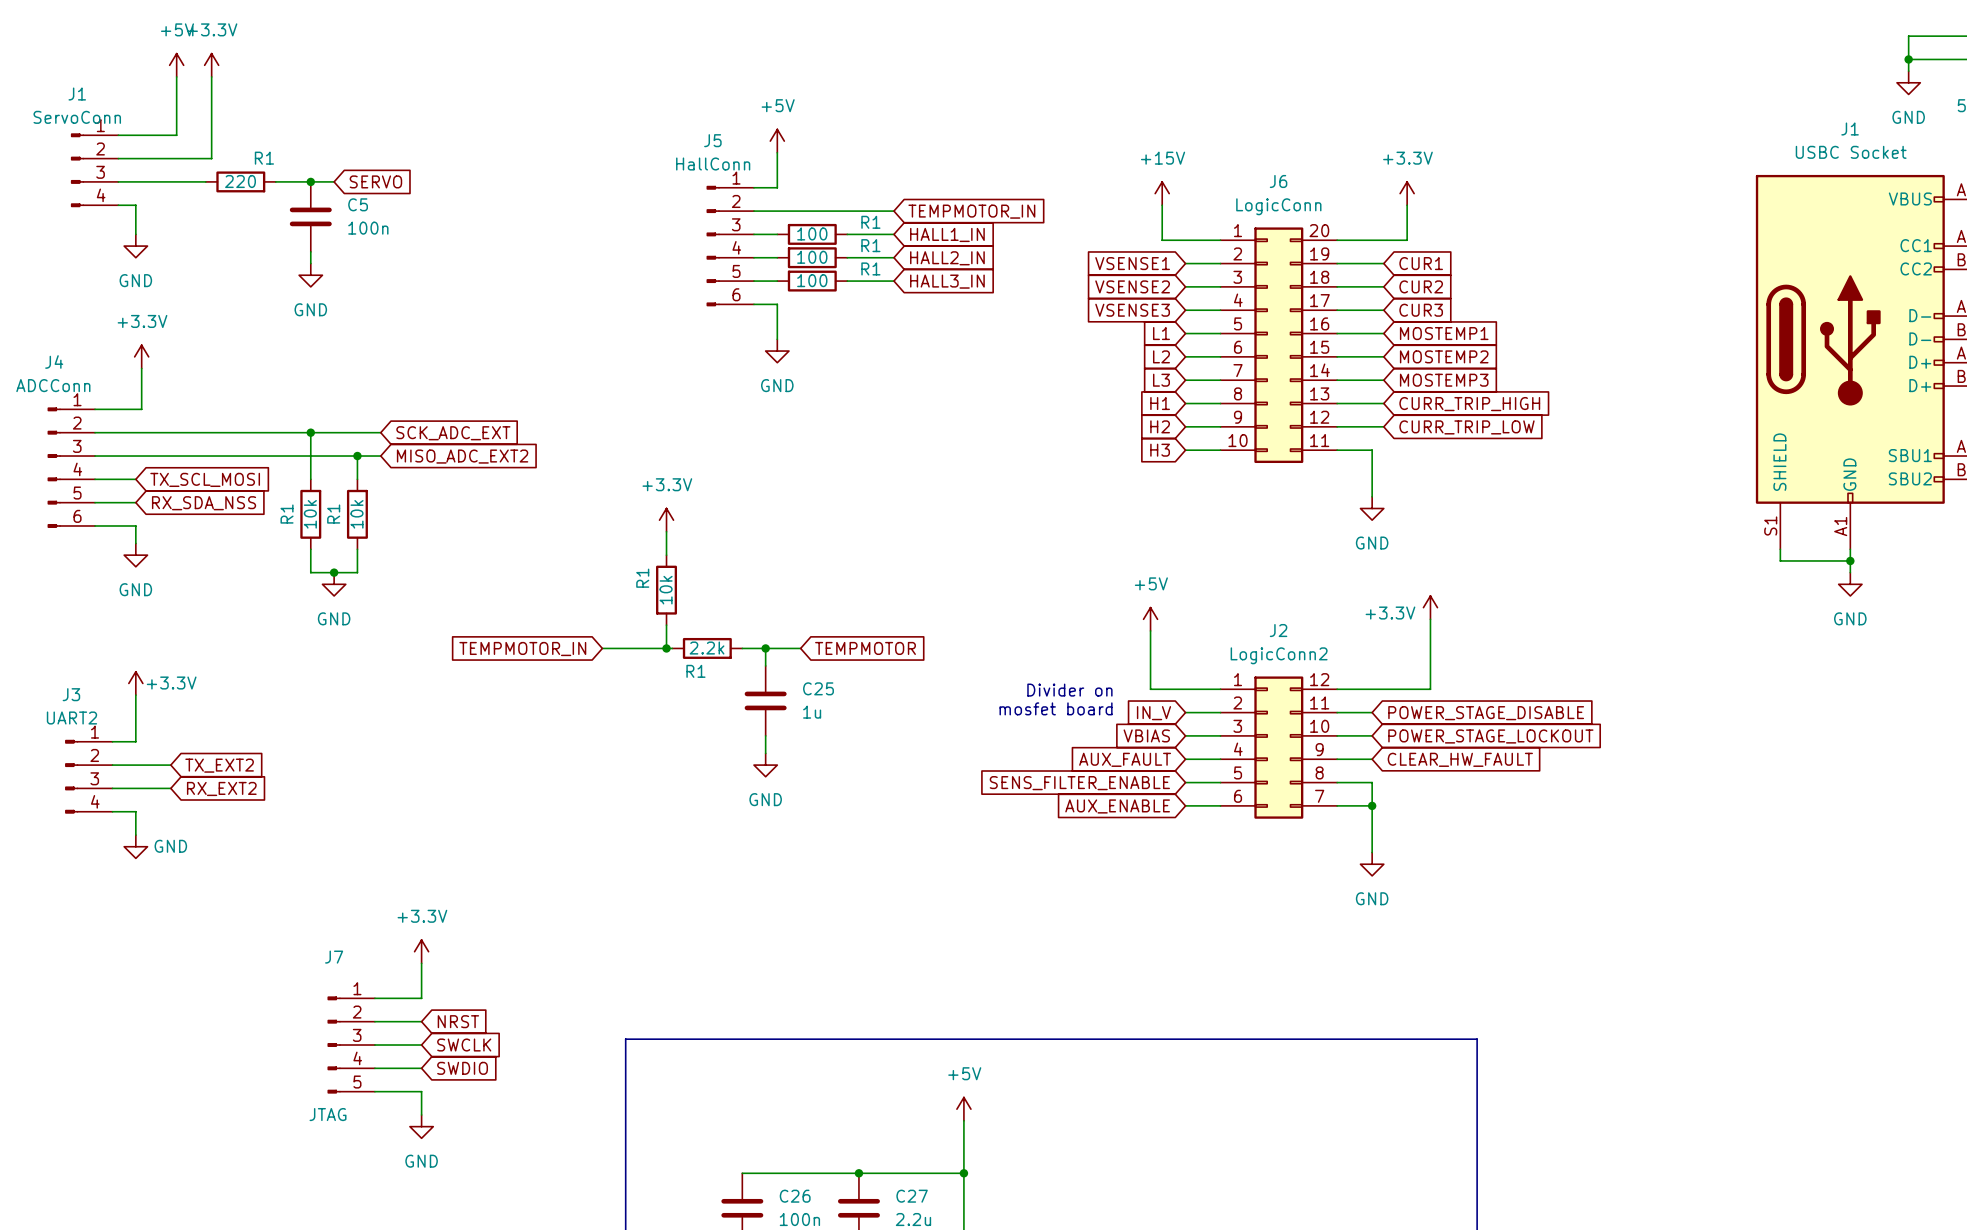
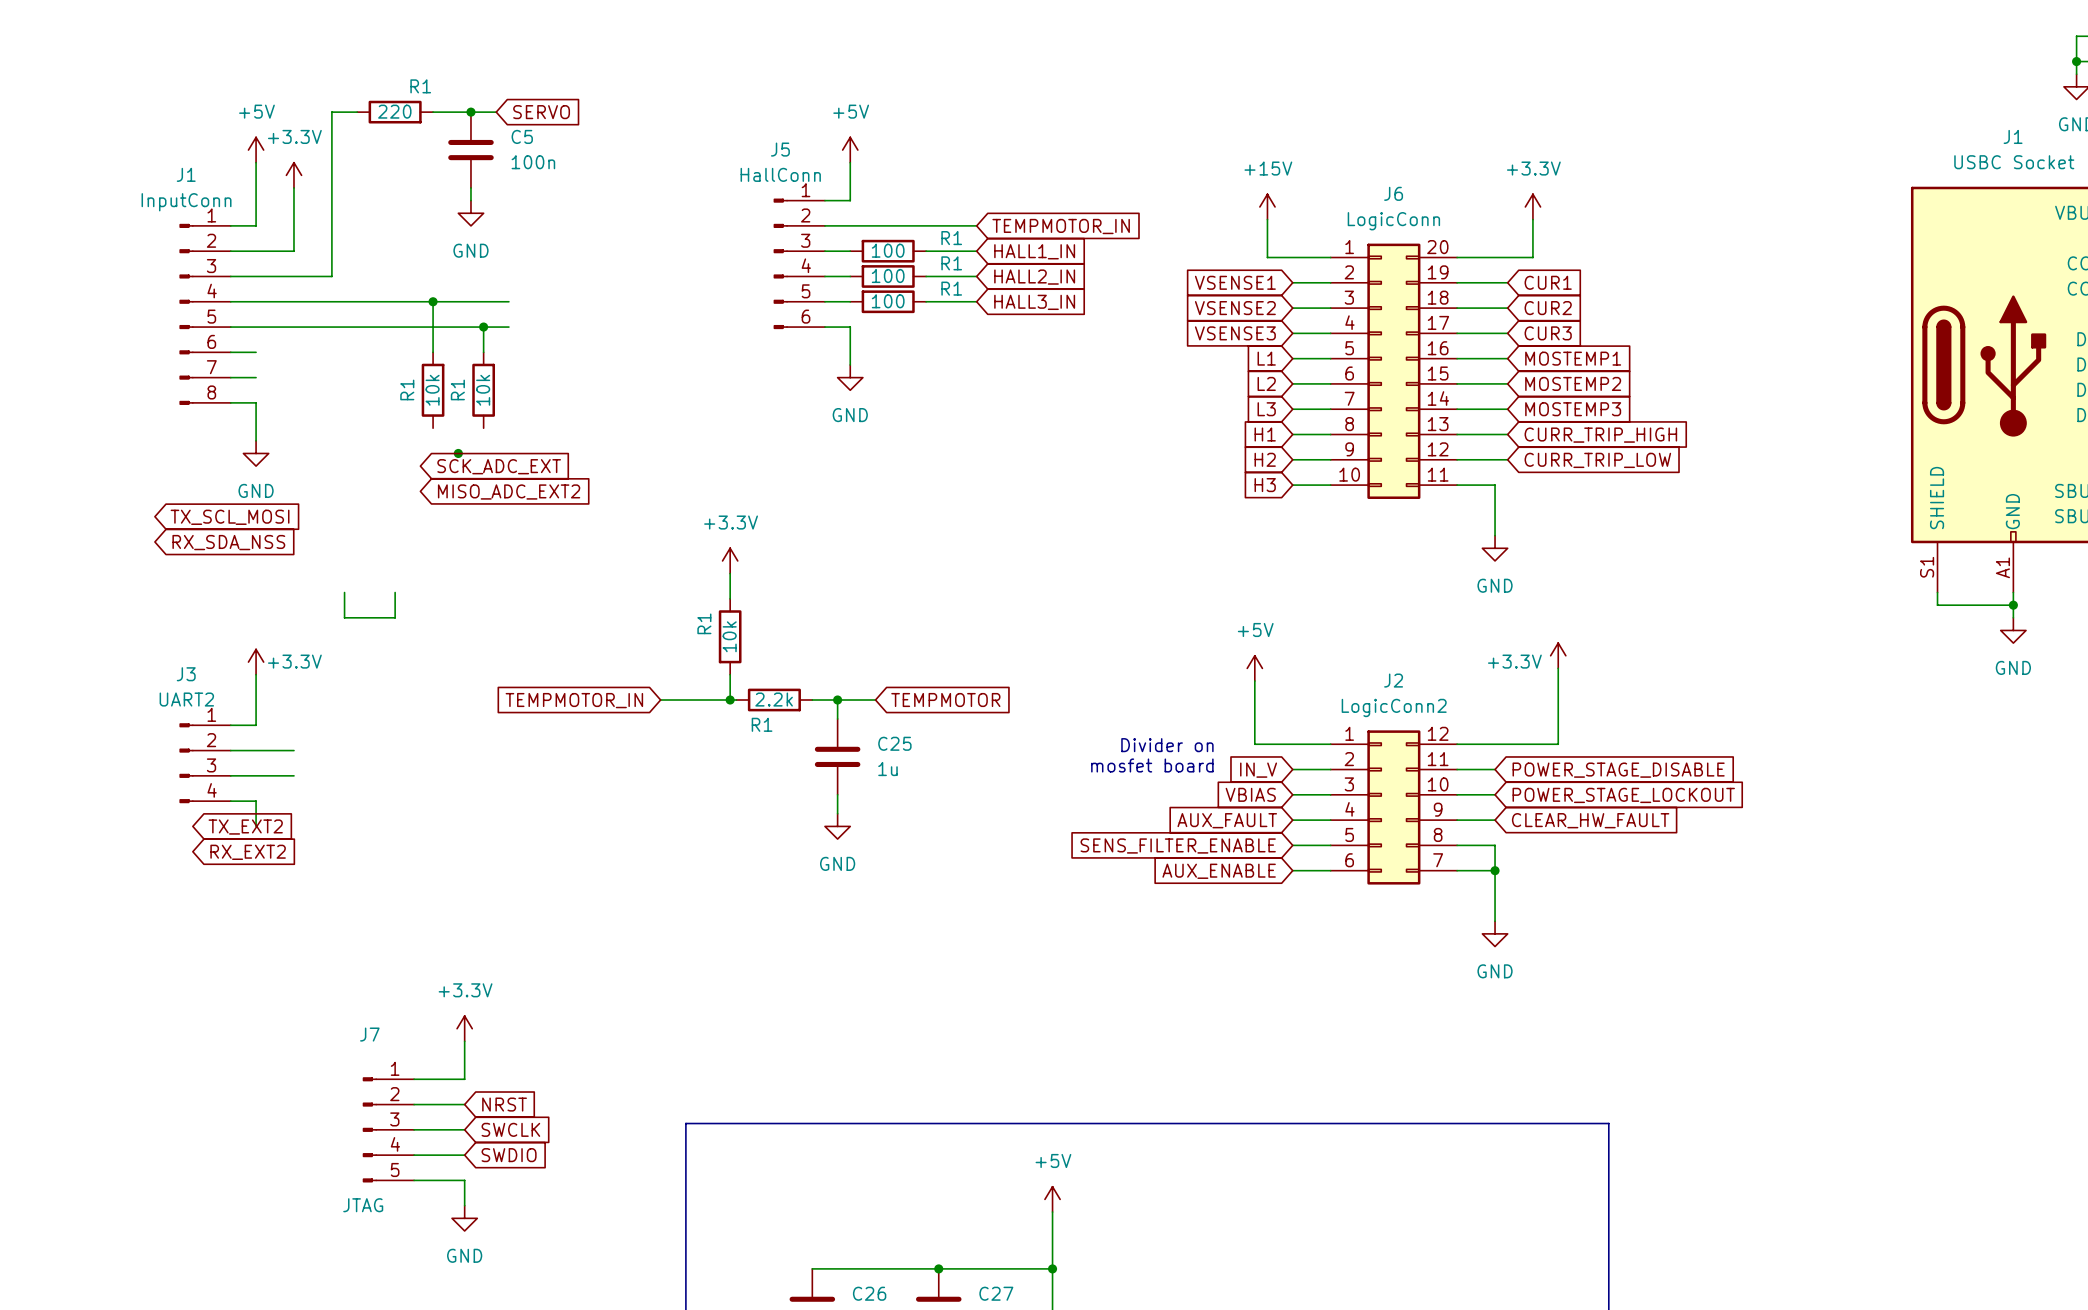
power symbol position: +5V (176, 65) -> +5V (256, 150)
power symbol position: +3.3V (211, 65) -> +3.3V (293, 175)
wire: (176, 76) (176, 135) (118, 135) -> (293, 187) (293, 251) (230, 251)
wire: (211, 76) (211, 158) (118, 158) -> none
wire: none -> (357, 112) (331, 112) (331, 276) (230, 276)
junction: none -> (470, 112)
wire: none -> (256, 162) (256, 225) (230, 225)
J1: ServoConn (94, 170) -> none
wire: (118, 181) (205, 181) -> none
R1 position: (240, 181) -> (395, 112)
wire: (275, 181) (334, 181) -> (433, 112) (496, 112)
junction: (310, 181) -> none
global label position: SERVO (375, 181) -> SERVO (541, 112)
power symbol: none -> GND (470, 213)
wire: (118, 205) (135, 205) (135, 234) -> none
C5 position: (310, 216) -> (470, 150)
power symbol: GND (135, 246) -> none
wire: (310, 251) (310, 263) -> (470, 187) (470, 200)
power symbol: GND (310, 275) -> none
wire: none -> (230, 301) (508, 301)
junction: none -> (433, 301)
J1: none -> InputConn (205, 314)
wire: none -> (230, 327) (508, 327)
junction: none -> (483, 327)
wire: none -> (230, 352) (256, 352)
wire: none -> (230, 377) (256, 377)
power symbol: +3.3V (141, 356) -> none
R1: none -> 10k (433, 390)
R1: none -> 10k (483, 390)
wire: (141, 368) (141, 409) (95, 409) -> none
wire: none -> (230, 402) (256, 402) (256, 440)
power symbol: none -> GND (256, 453)
junction: none -> (458, 453)
wire: (95, 432) (380, 432) -> none
wire: (310, 432) (310, 479) -> (433, 301) (433, 352)
junction: (310, 432) -> none
wire: (95, 456) (380, 456) -> none
wire: (357, 456) (357, 479) -> (483, 327) (483, 352)
junction: (357, 456) -> none
J4: ADCConn (71, 467) -> none
wire: (95, 479) (135, 479) -> none
wire: (95, 502) (135, 502) -> none
R1: 10k (310, 514) -> none
R1: 10k (357, 514) -> none
wire: (95, 525) (135, 525) (135, 543) -> none
power symbol: GND (135, 555) -> none
junction: (334, 572) -> none
power symbol: GND (334, 584) -> none
power symbol position: +3.3V (135, 683) -> +3.3V (256, 662)
wire: (135, 695) (135, 741) (112, 741) -> (256, 674) (256, 725) (230, 725)
wire: (112, 765) (170, 765) -> (230, 750) (293, 750)
J3 position: (88, 776) -> (205, 763)
wire: (112, 788) (170, 788) -> (230, 775) (293, 775)
wire: (112, 811) (135, 811) (135, 835) -> (230, 801) (256, 801) (256, 826)
power symbol: GND (135, 846) -> none

